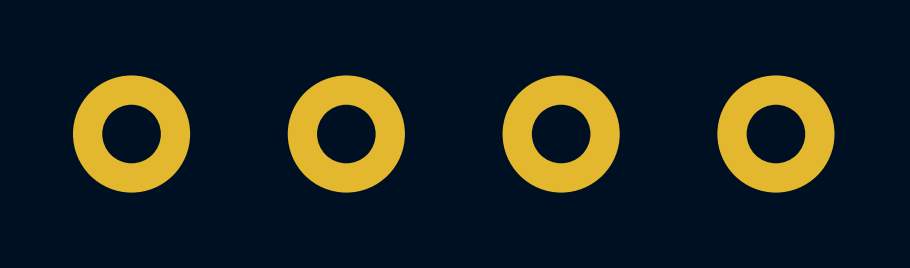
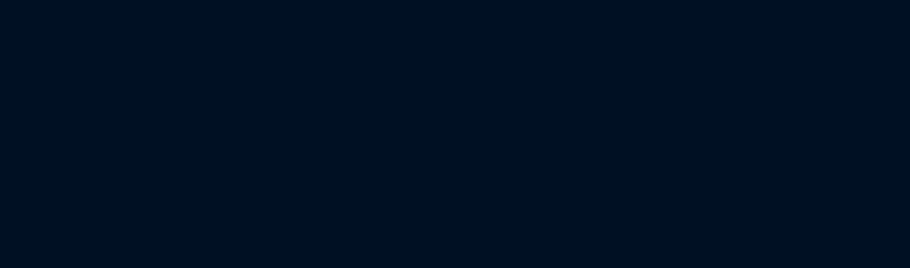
part: (131, 134) -> none
part: (346, 134) -> none
part: (561, 134) -> none
part: (775, 134) -> none

